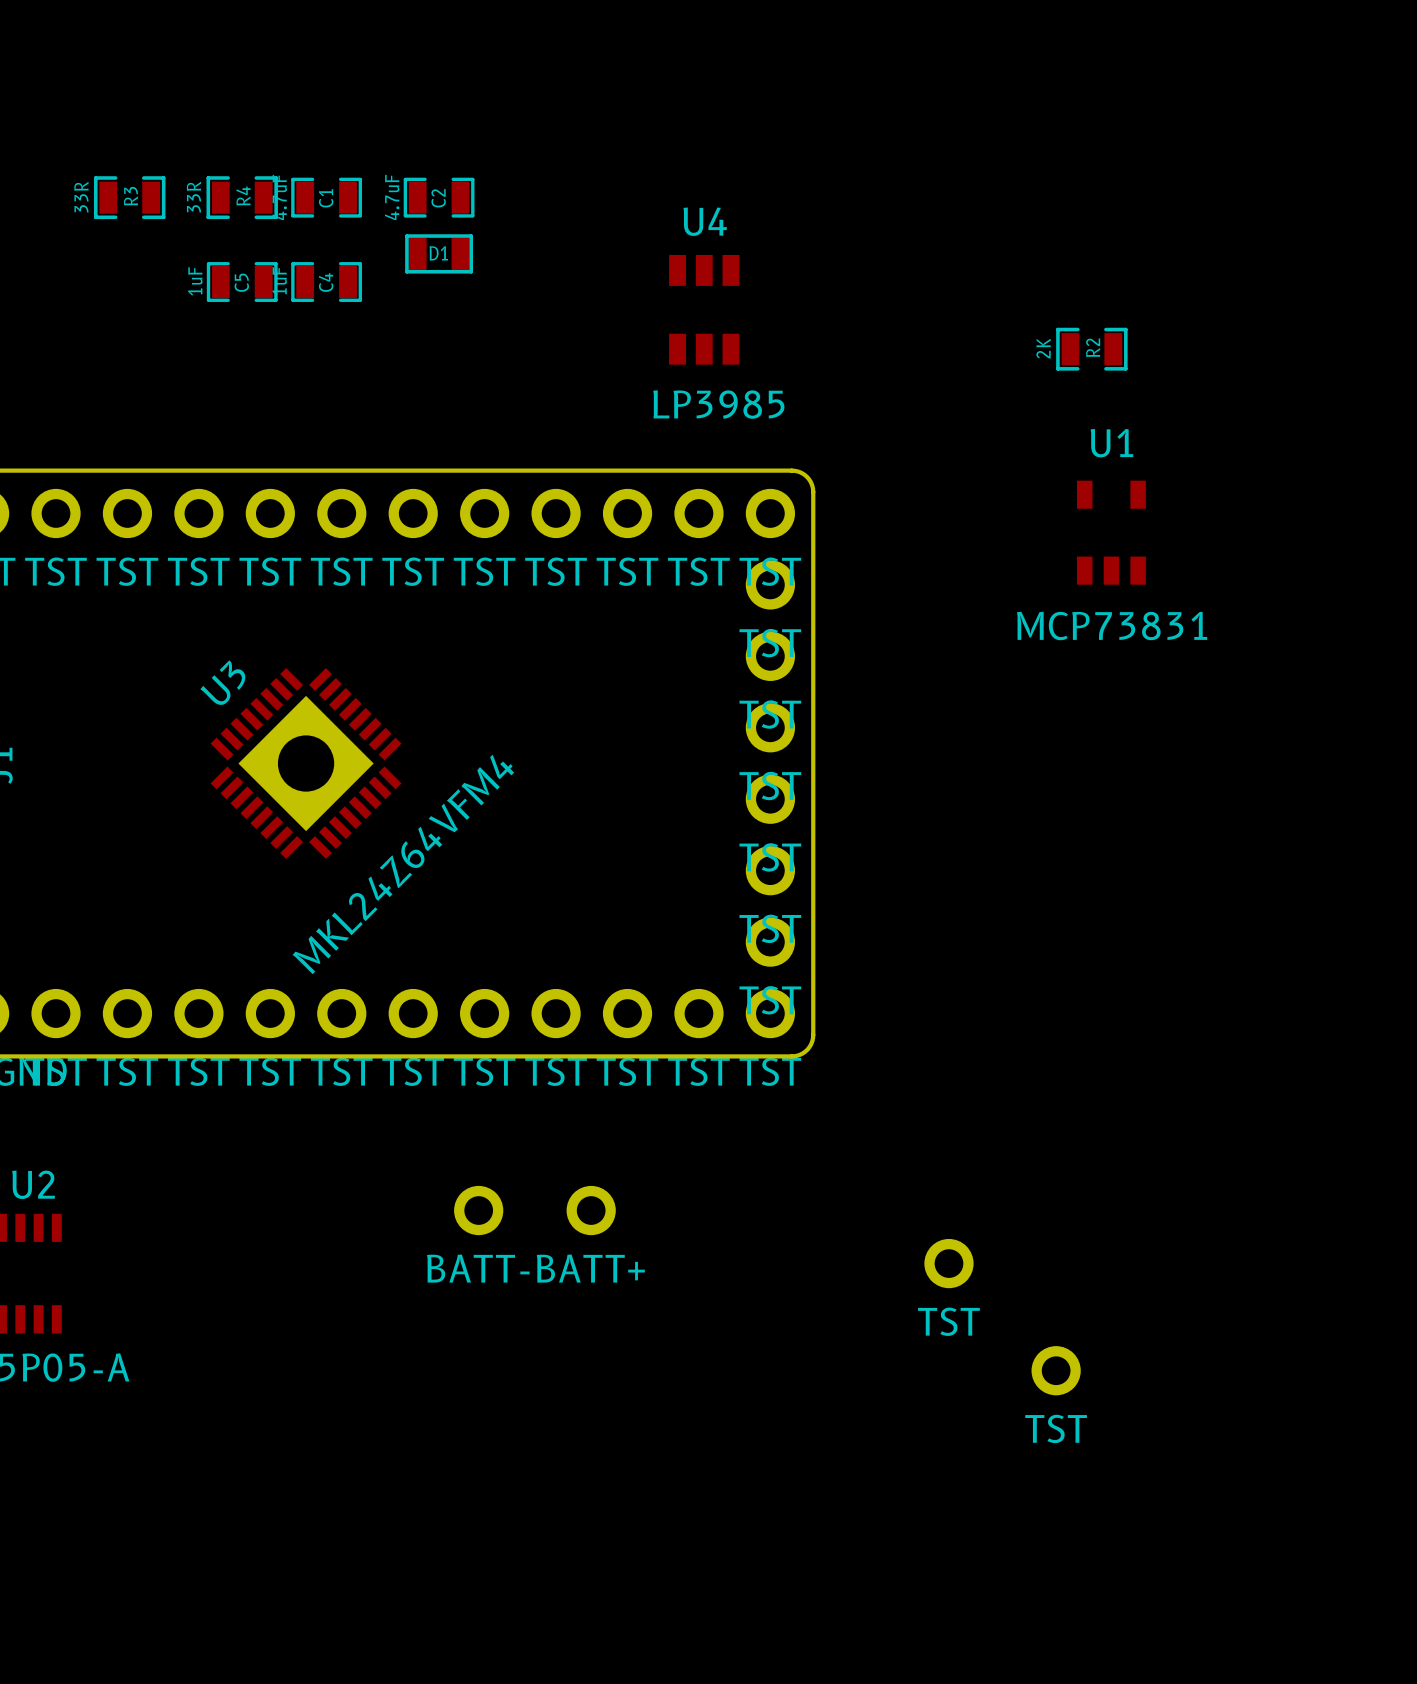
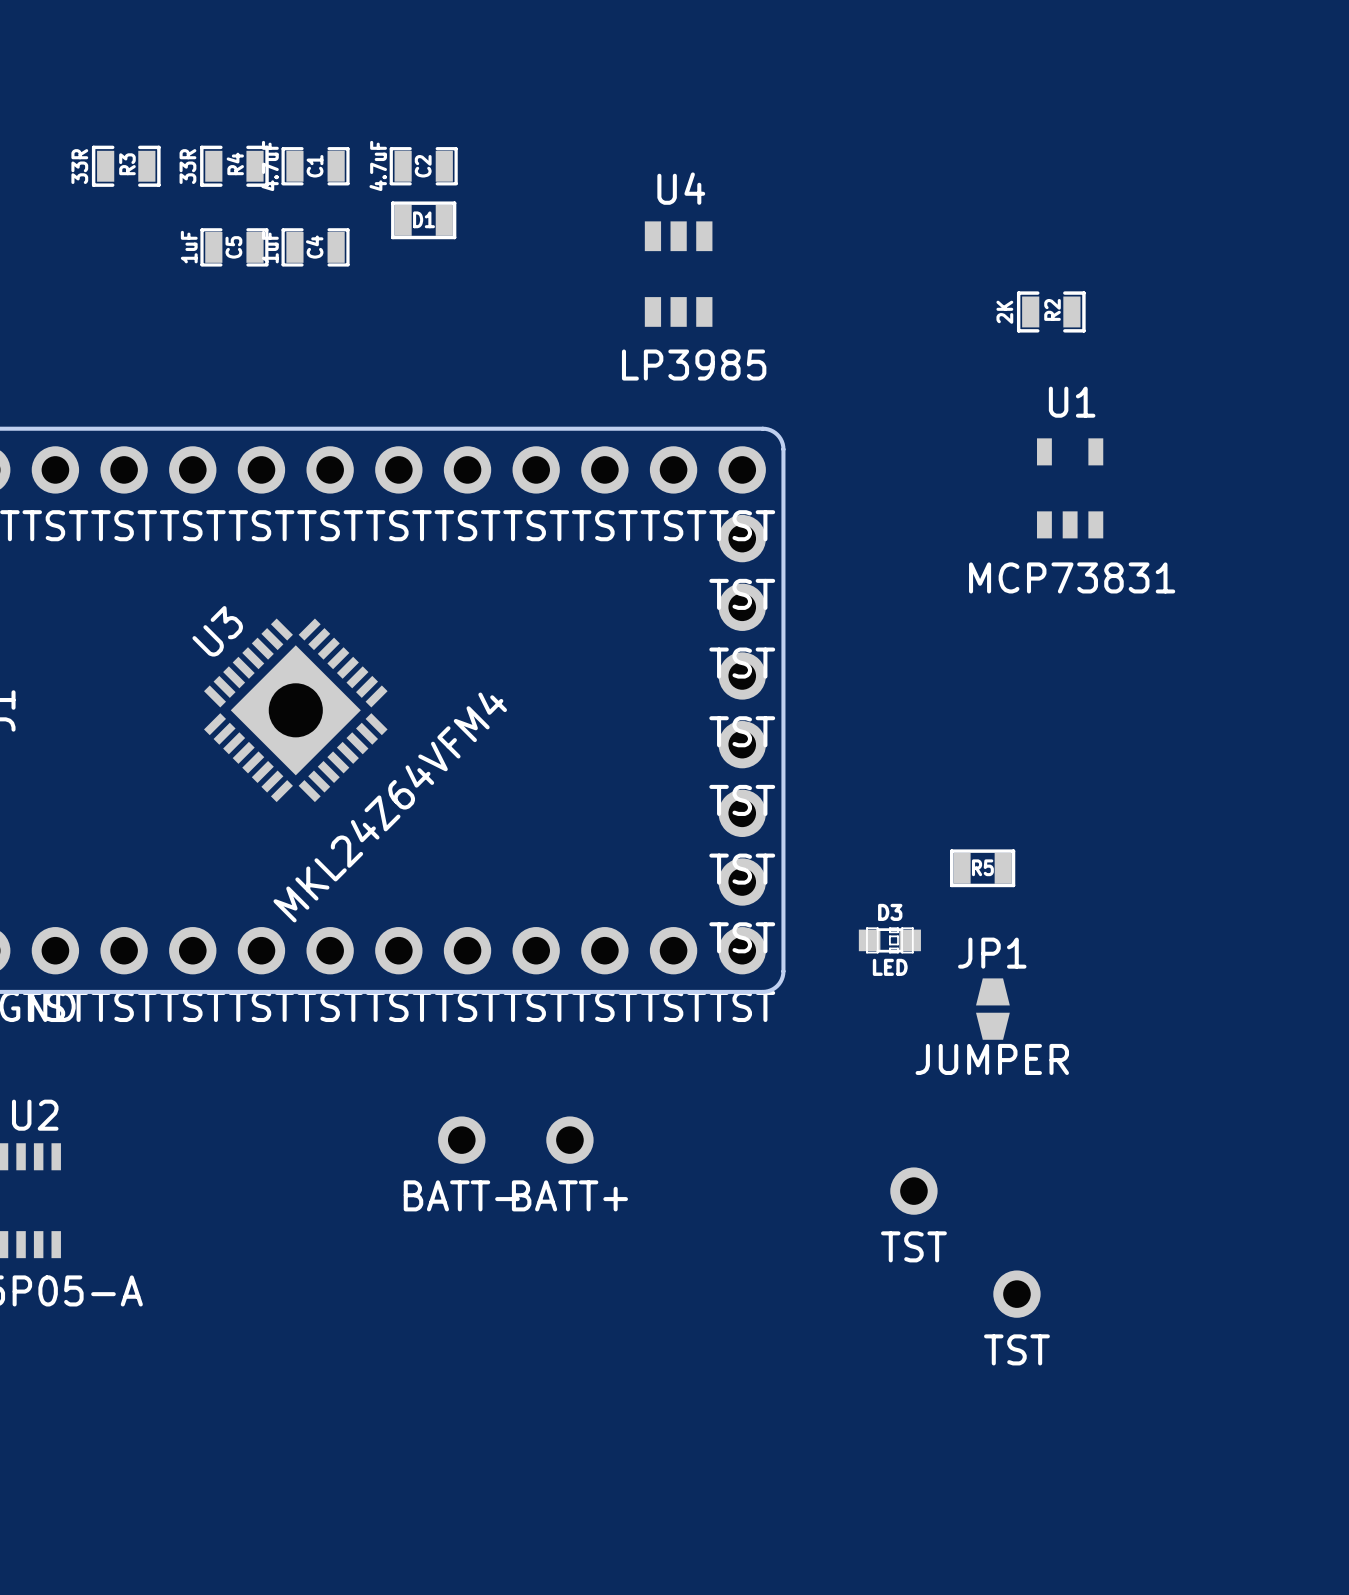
R5: none -> (982, 868)
D3: none -> LED (889, 940)
JP1: none -> JUMPER (992, 1009)

